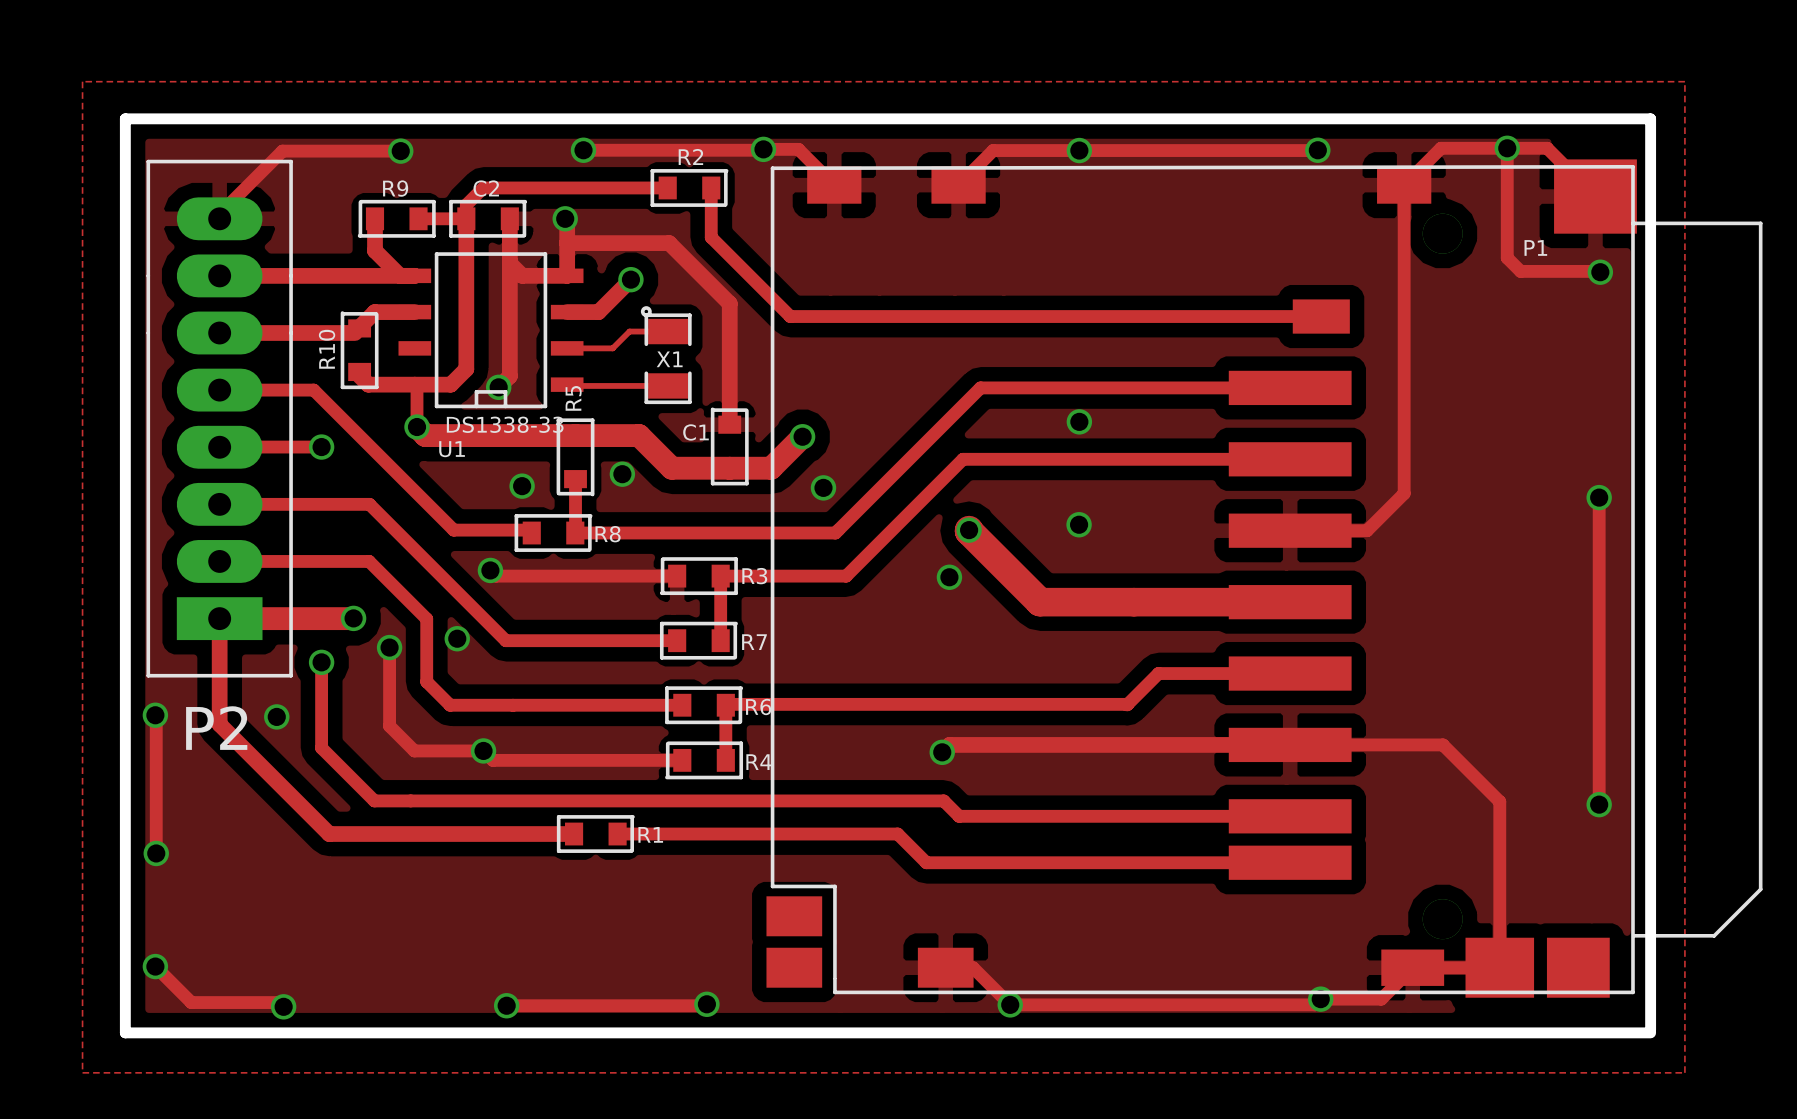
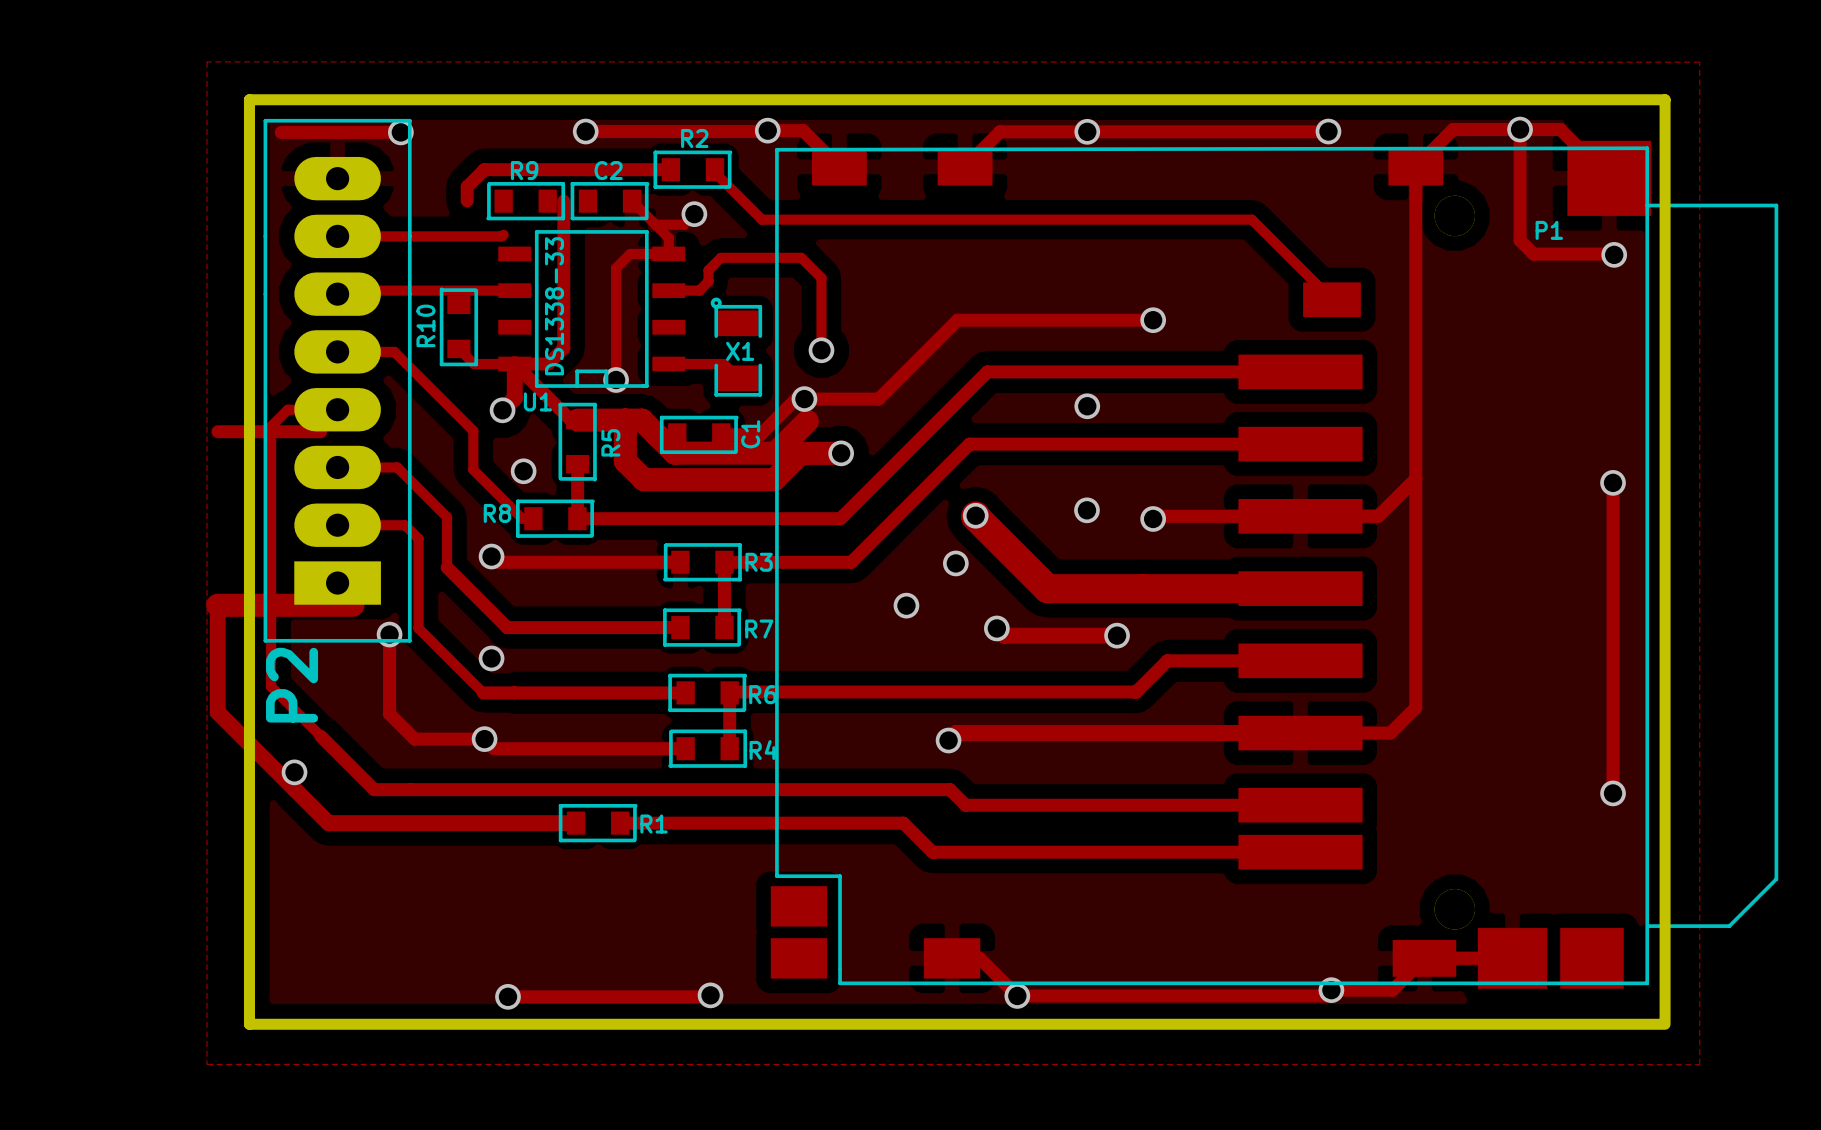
zone outline: (1684, 81) (82, 81) (82, 1072) (1684, 1072) -> (1699, 62) (206, 61) (206, 1064) (1699, 1064)
board edge: (251, 118) (125, 118) (125, 1032) (251, 1032) -> (249, 99) (249, 1024)
track: (282, 151) (219, 213) (219, 218) (219, 210) -> none
track: (711, 190) (711, 237) (790, 316) (1321, 316) -> (714, 172) (761, 219) (1251, 219) (1331, 299)
track: (374, 218) (374, 250) (400, 275) -> none
R9 position: (396, 218) -> (525, 201)
track: (418, 218) (466, 218) (466, 369) (450, 384) (368, 384) (359, 375) (359, 371) -> none
C2 position: (488, 218) -> (610, 201)
track: (509, 218) (509, 376) (498, 387) -> none
track: (565, 218) (567, 220) (567, 275) (522, 275) (509, 263) -> none
via: (565, 218) -> none
track: none -> (563, 201) (563, 348) (547, 364) (514, 364)
track: none -> (632, 201) (668, 238) (668, 253) (630, 253) (616, 268) (616, 379)
track: none -> (694, 214) (683, 224) (655, 224)
via: none -> (694, 214)
track: (567, 243) (669, 243) (729, 303) (729, 424) -> none
track: none -> (503, 234) (501, 236) (337, 236)
track: (630, 279) (598, 312) (567, 312) -> none
via: (630, 279) -> none
track: none -> (514, 290) (341, 290) (337, 294)
track: none -> (668, 290) (699, 290) (708, 281) (708, 270) (720, 257) (801, 257) (821, 277) (821, 350)
track: (414, 312) (374, 312) (359, 328) -> none
track: (359, 328) (355, 333) (219, 333) -> none
U1 position: (491, 330) -> (591, 308)
track: (668, 331) (629, 331) (612, 348) (567, 348) -> none
track: none -> (1153, 320) (957, 320) (878, 399) (796, 399) (760, 434) (721, 434)
via: none -> (1153, 320)
R10 position: (359, 350) -> (458, 326)
X1 position: (666, 355) -> (736, 347)
track: none -> (458, 348) (474, 364) (514, 364)
via: none -> (821, 350)
track: none -> (514, 364) (514, 398) (502, 410)
track: none -> (668, 364) (723, 364) (738, 378)
track: (414, 384) (417, 386) (417, 427) (425, 435) (568, 435) -> (514, 364) (570, 420)
track: (567, 384) (668, 385) -> none
via position: (498, 387) -> (502, 410)
track: (219, 390) (313, 390) (453, 530) (528, 530) (531, 533) -> (337, 351) (394, 351) (473, 430) (473, 469) (522, 518) (533, 518)
via: none -> (616, 379)
R5 name position: R5 (573, 398) -> R5 (610, 442)
P2 position: (219, 418) -> (337, 380)
U1 value rotation: 0° (505, 424) -> 90° counterclockwise (554, 306)
via: (417, 427) -> none
track: none -> (625, 420) (625, 461) (643, 479) (774, 479) (800, 453) (841, 453)
via position: (802, 436) -> (804, 399)
C1 rotation: 0° (729, 446) -> 90° clockwise (699, 434)
via: (321, 447) -> none
U1 name position: U1 (452, 449) -> U1 (537, 401)
via: (622, 474) -> none
via position: (823, 487) -> (841, 453)
track: (219, 504) (369, 504) (446, 581) -> (337, 467) (397, 467) (447, 517) (447, 567)
track: none -> (1300, 516) (1155, 516) (1153, 518)
via: none -> (1153, 518)
R8 name position: R8 (608, 534) -> R8 (497, 513)
track: (219, 561) (369, 561) (426, 618) (426, 681) (450, 705) (482, 705) -> (337, 525) (405, 525) (418, 538) (418, 628) (483, 692)
via: (353, 618) -> none
via: none -> (906, 605)
via position: (457, 638) -> (491, 658)
track: none -> (996, 628) (1004, 635) (1117, 635)
via: none -> (996, 628)
via: none -> (1117, 635)
track: (321, 662) (321, 748) -> (337, 409) (287, 409) (271, 426) (271, 686) (320, 736)
via: (321, 662) -> none
track: (155, 715) (156, 853) -> none
via: (155, 715) -> none
via: (276, 716) -> none
P2 name rotation: 0° (216, 728) -> 90° counterclockwise (292, 685)
track: (1379, 744) (1442, 744) (1499, 801) (1499, 967) -> (1390, 733) (1415, 707) (1415, 478)
via: none -> (294, 772)
via: (156, 853) -> none
track: (155, 966) (191, 1002) (279, 1002) (283, 1006) -> none
via: (155, 966) -> none
via: (283, 1006) -> none

